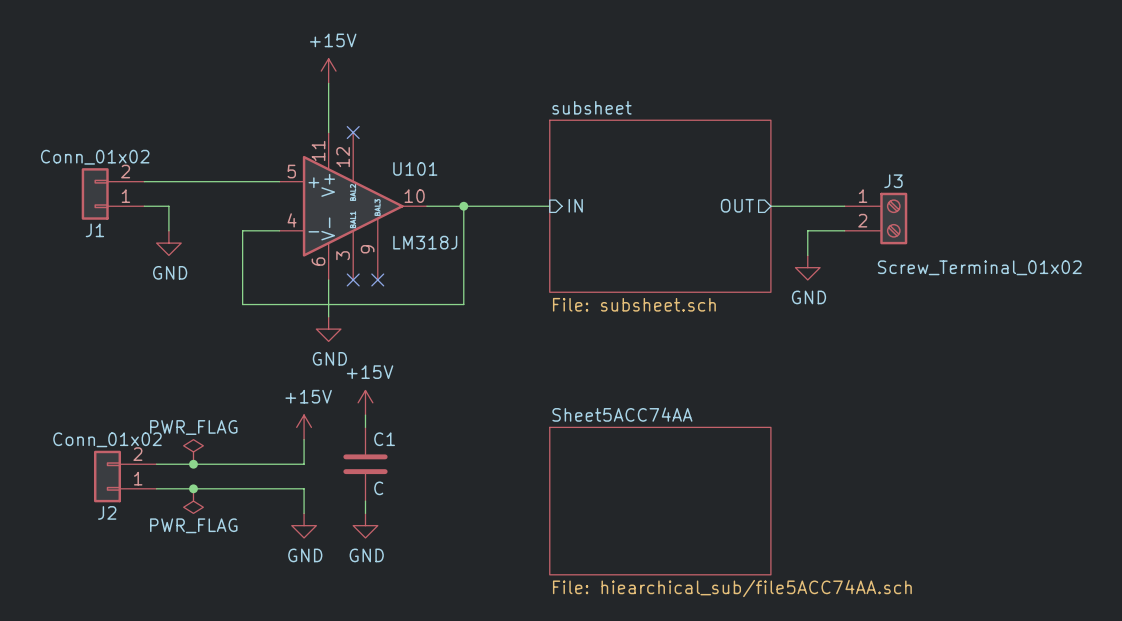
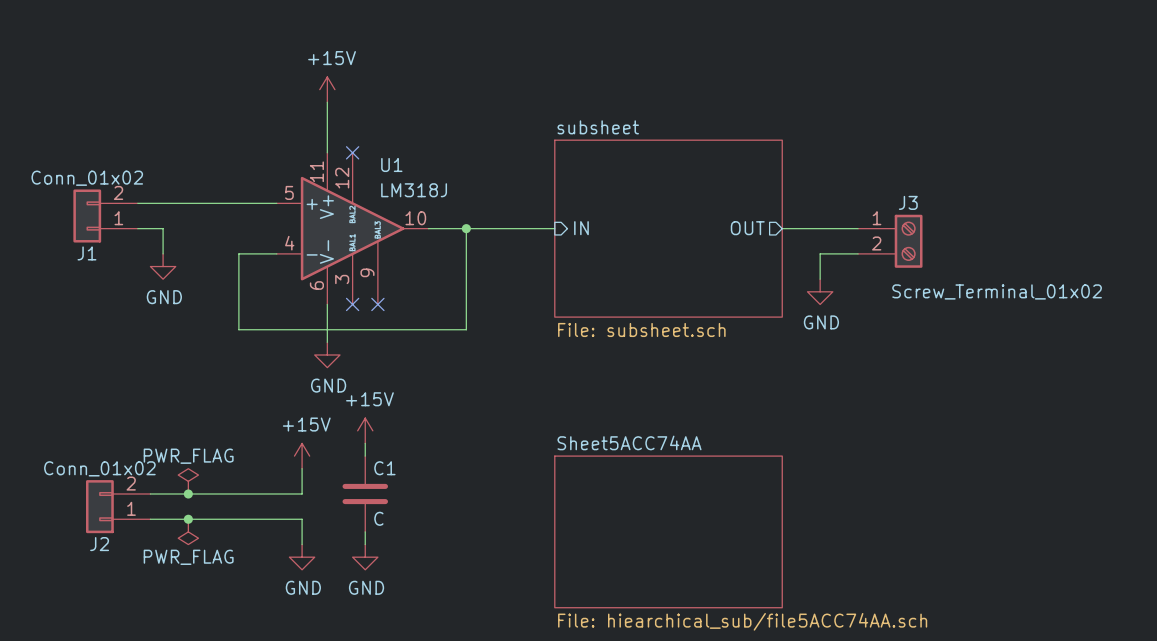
U101 name: U101 (415, 168) -> U1 (391, 164)
U101 value position: LM318J (425, 242) -> LM318J (414, 190)

